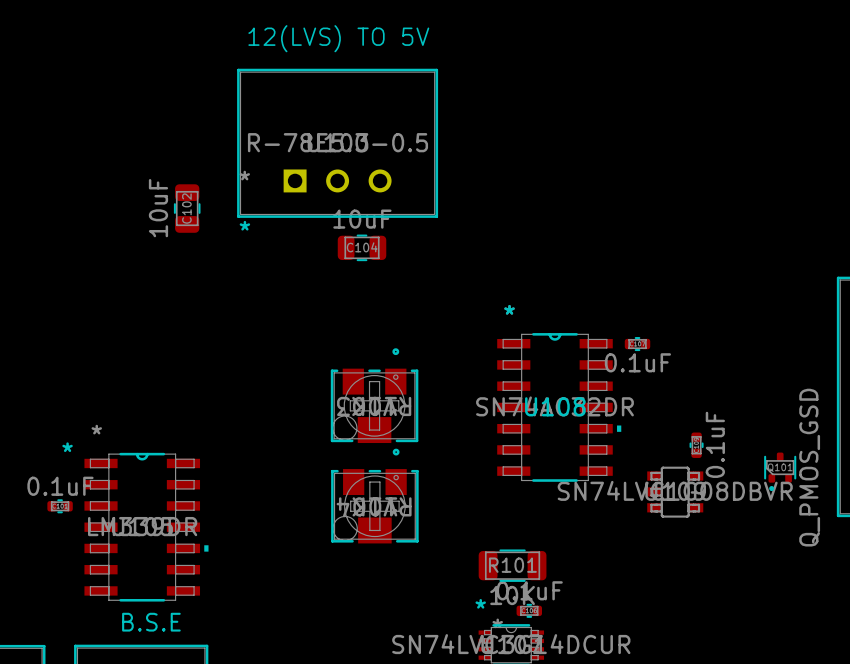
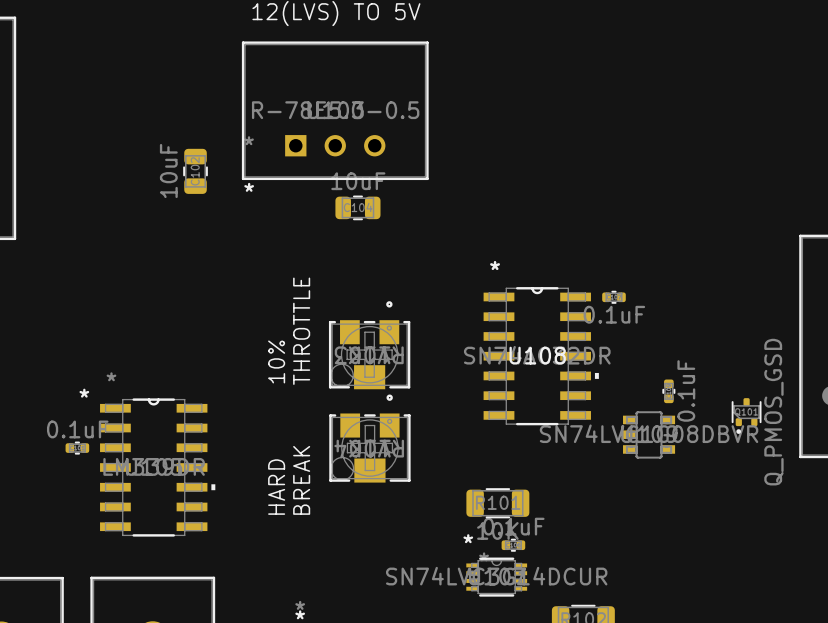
text: none -> THROTTLE (301, 331)
text: none -> 10% (276, 361)
text: none -> BREAK (301, 480)
text: none -> HARD (276, 487)
text: B.S.E (151, 622) -> none

